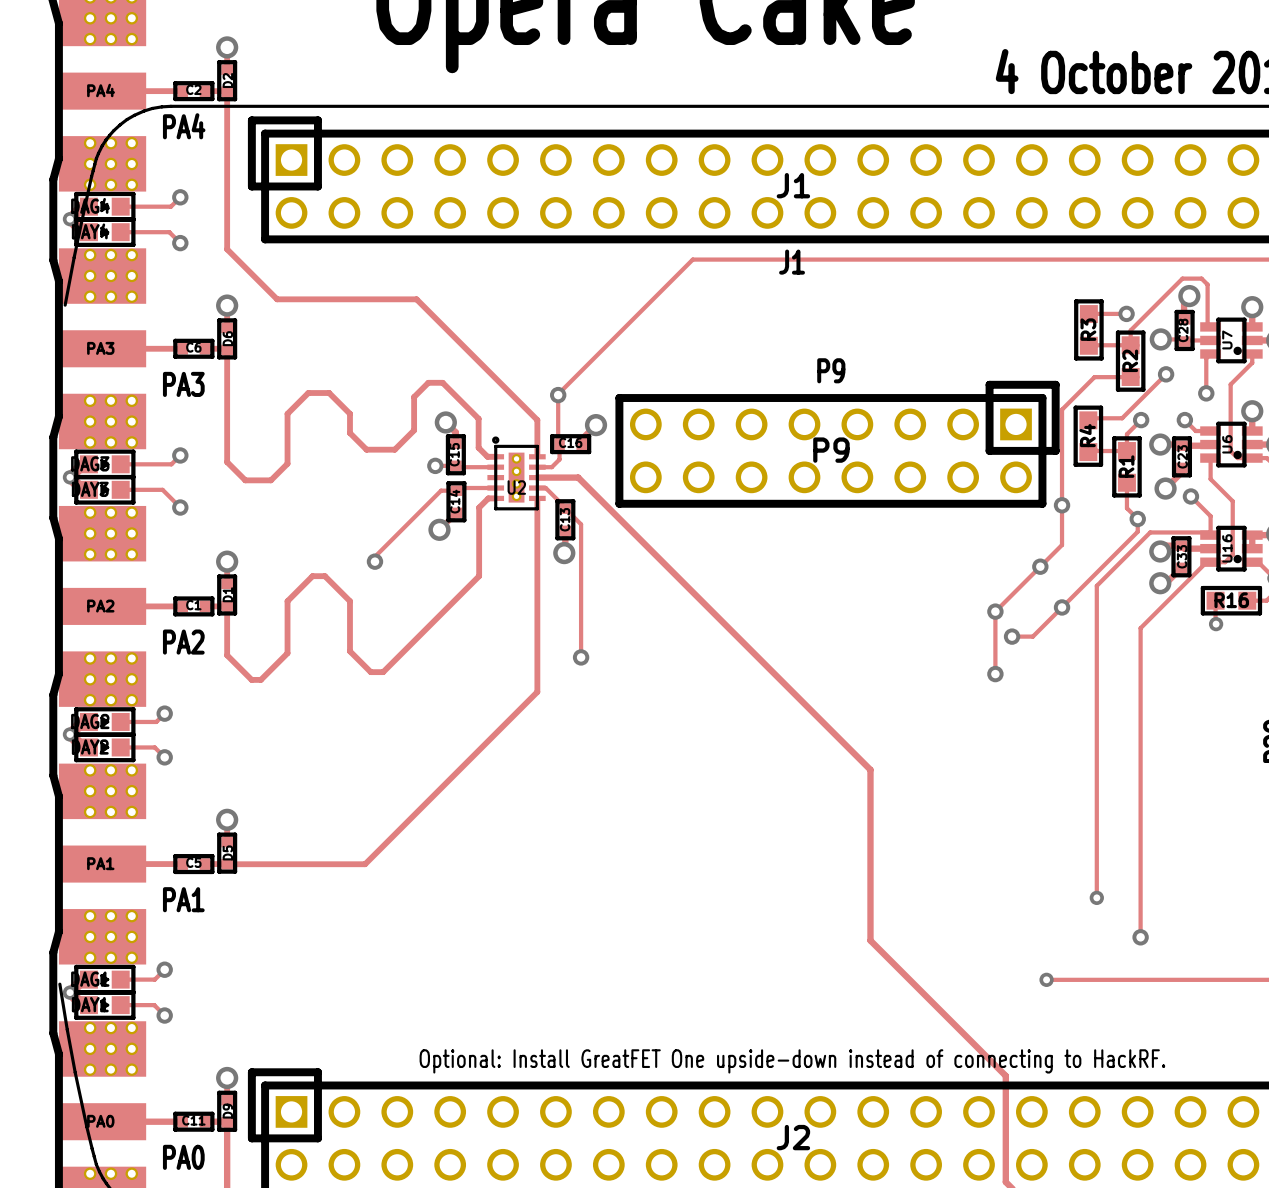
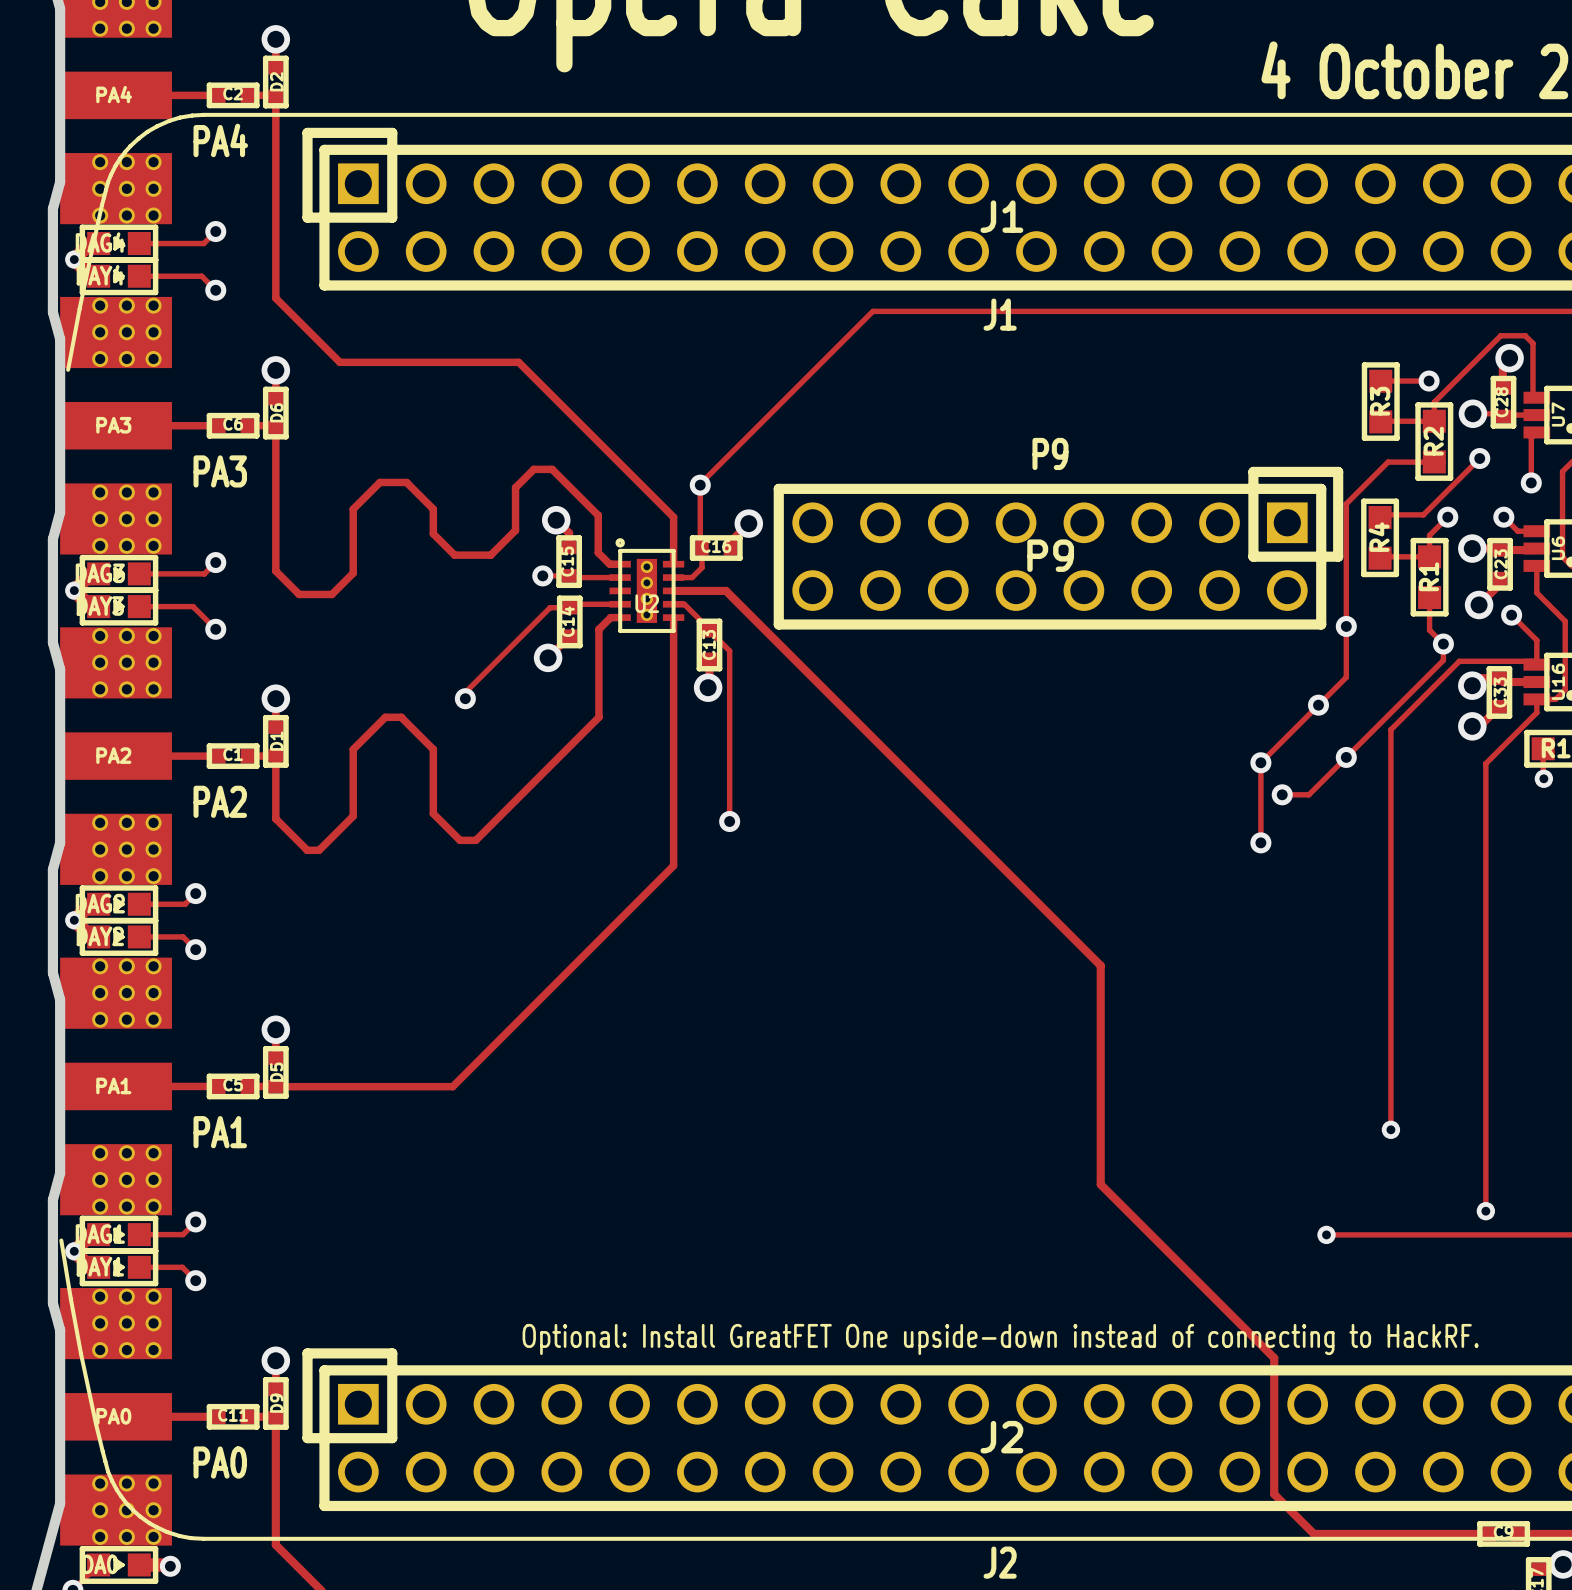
track: (1206, 562) (1140, 628) (1140, 937) -> none
track: none -> (1536, 699) (1536, 712) (1485, 763) (1485, 1211)
via: (1140, 937) -> none
via: none -> (1485, 1211)

